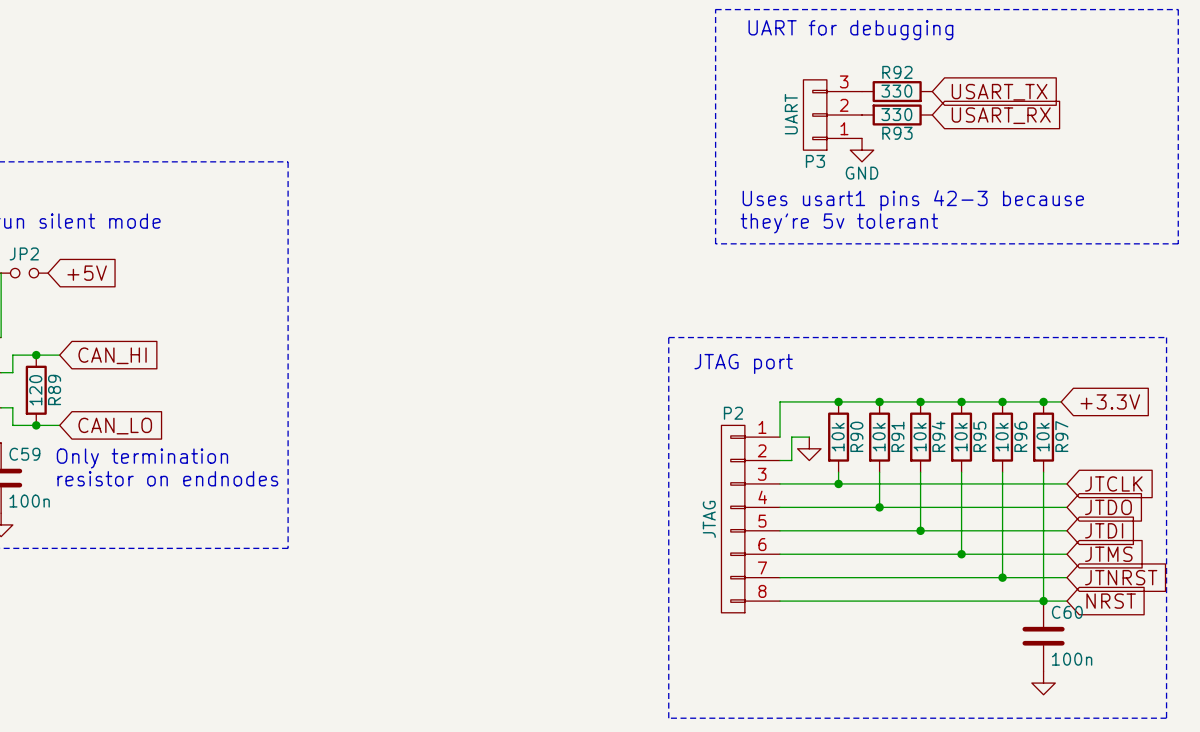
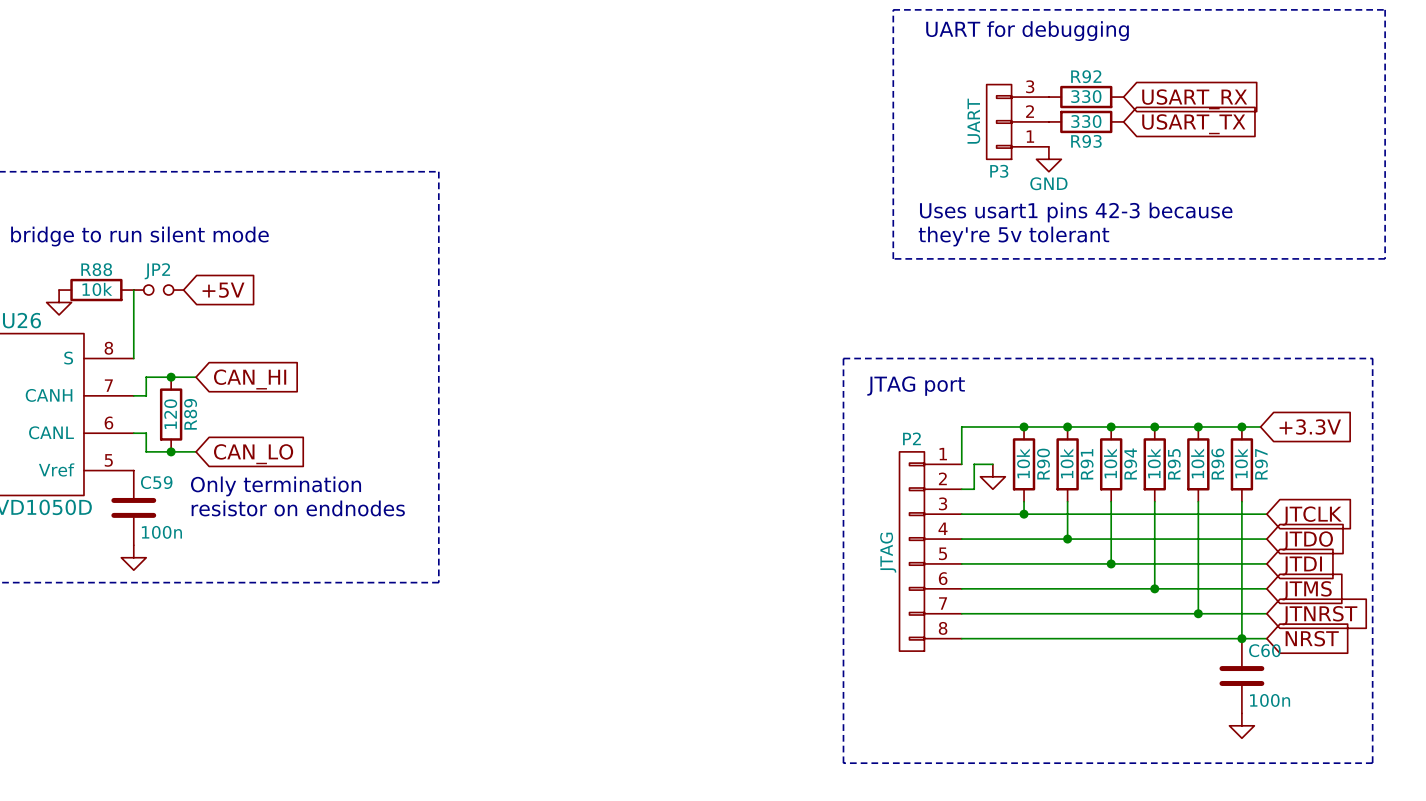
global label: USART_TX (999, 92) -> USART_RX (1194, 99)
global label: USART_RX (1001, 115) -> USART_TX (1193, 124)

